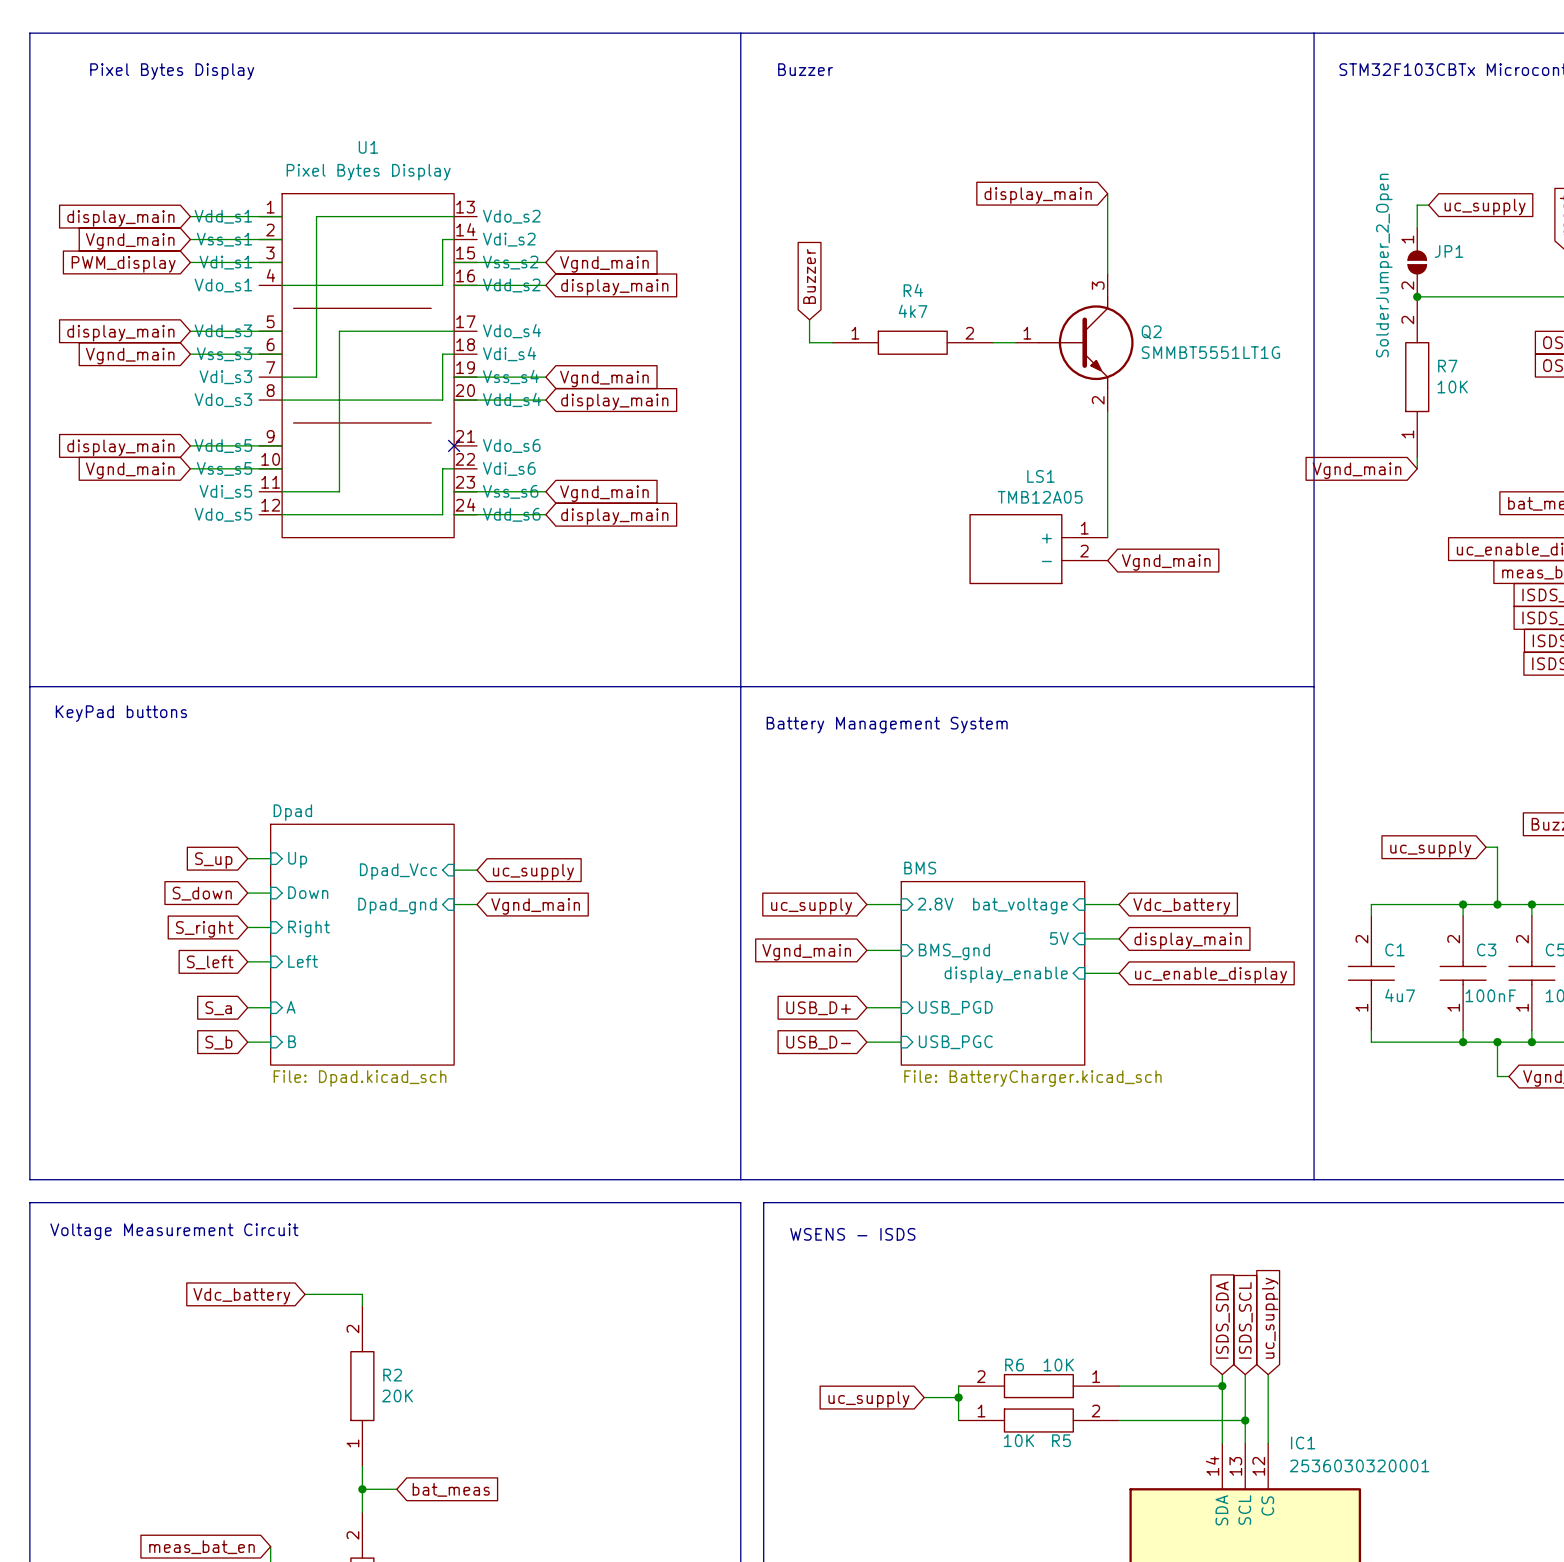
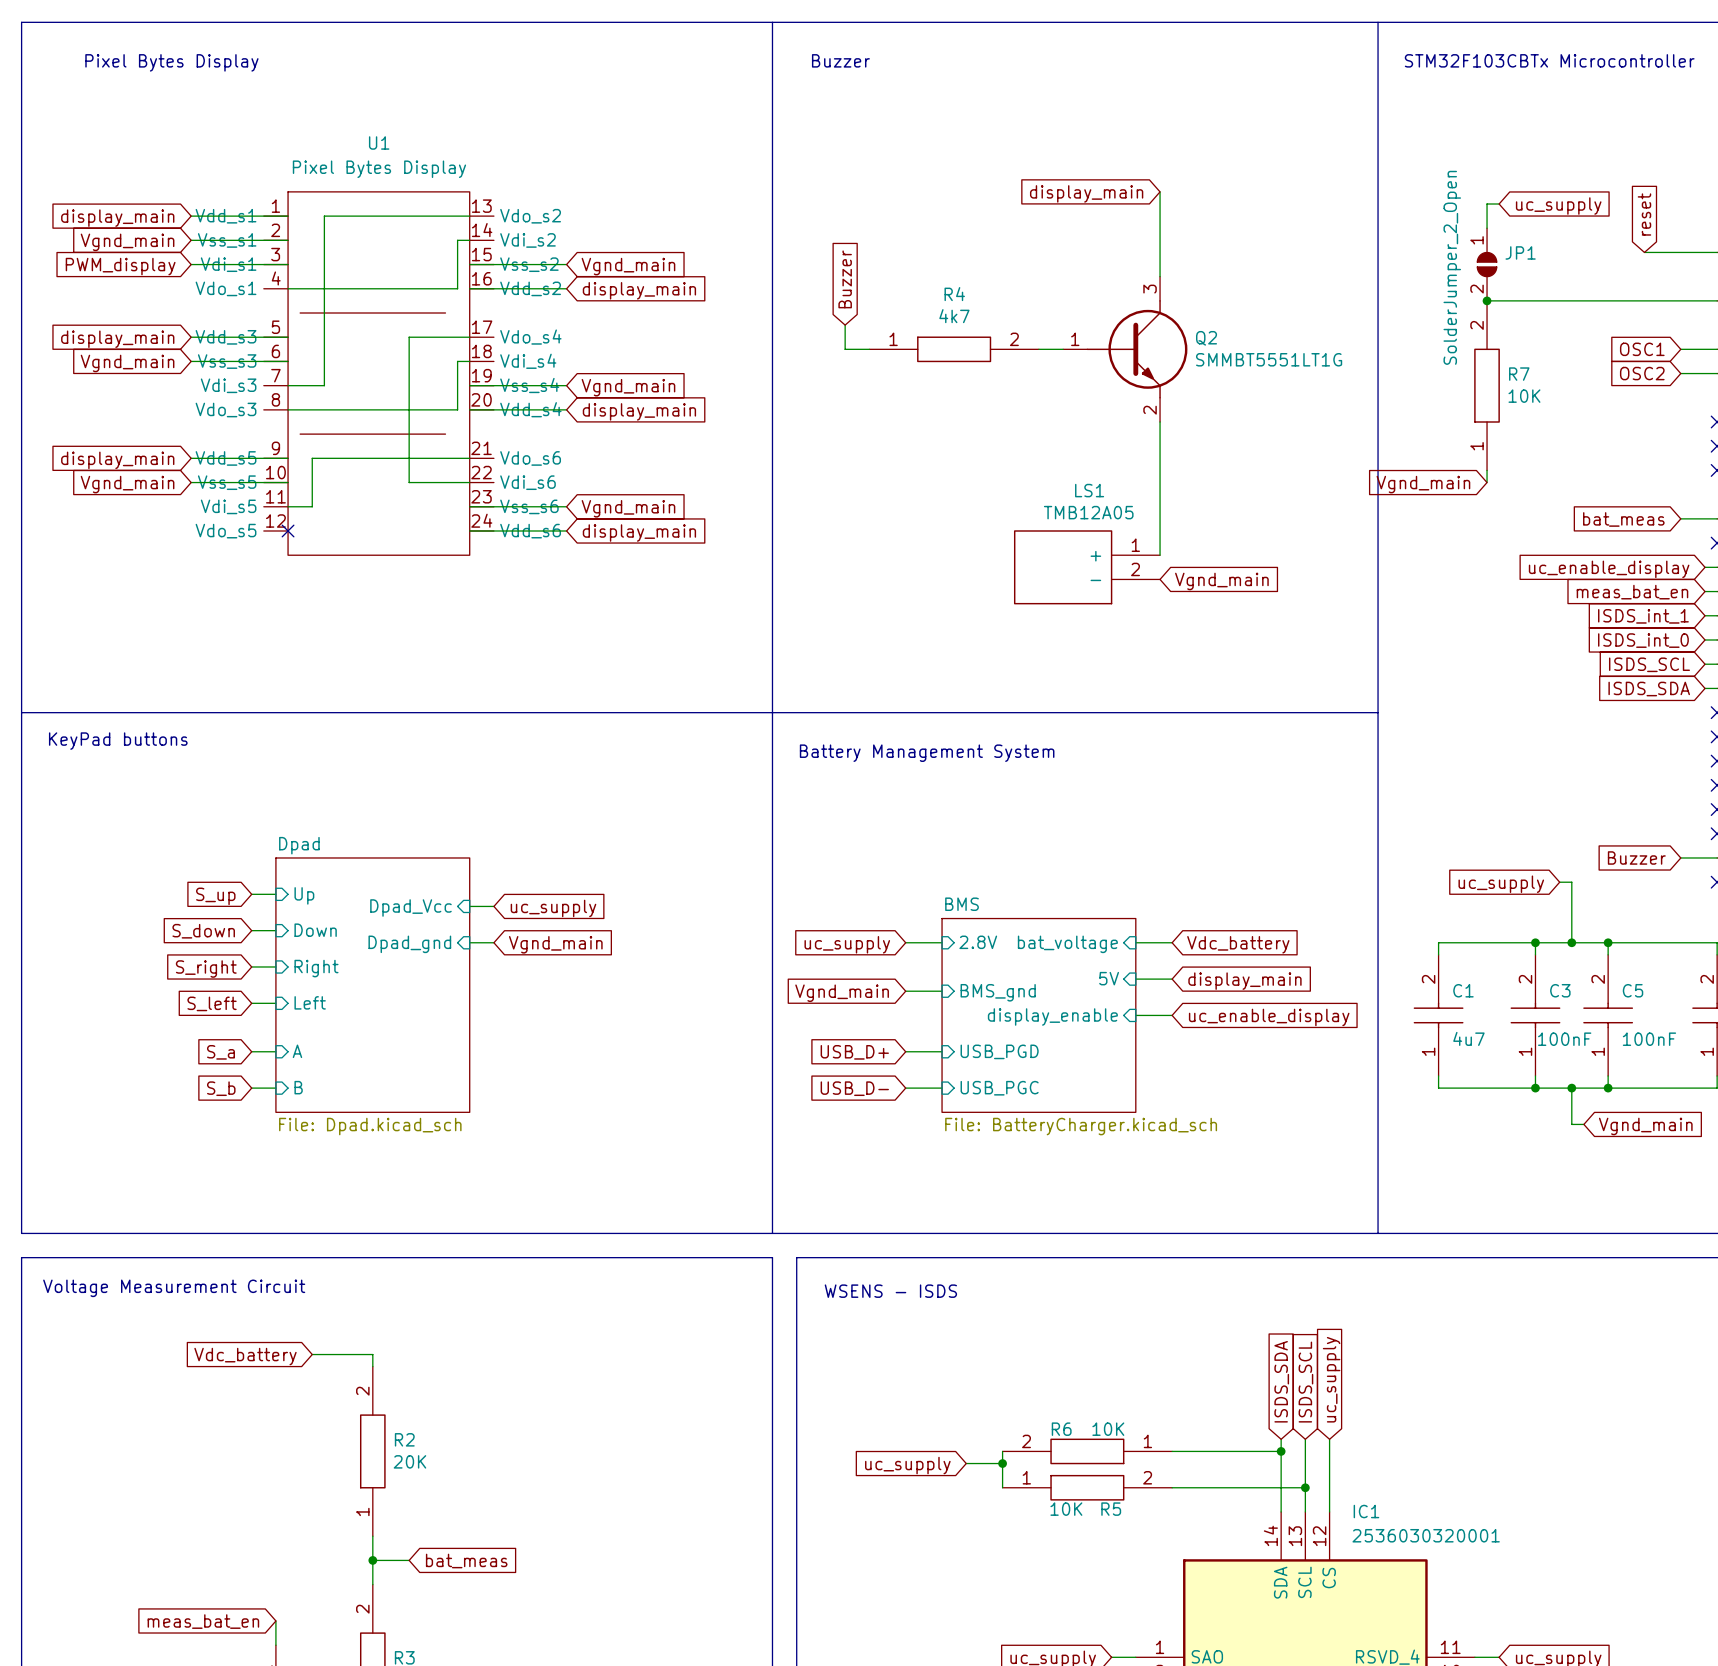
wire: (396, 331) (339, 331) (339, 491) (305, 491) -> (469, 458) (312, 458) (312, 506)
no-connect mark: (454, 445) -> none
wire: (442, 468) (442, 514) (282, 514) -> (457, 482) (409, 482) (409, 337)
no-connect mark: none -> (288, 530)

